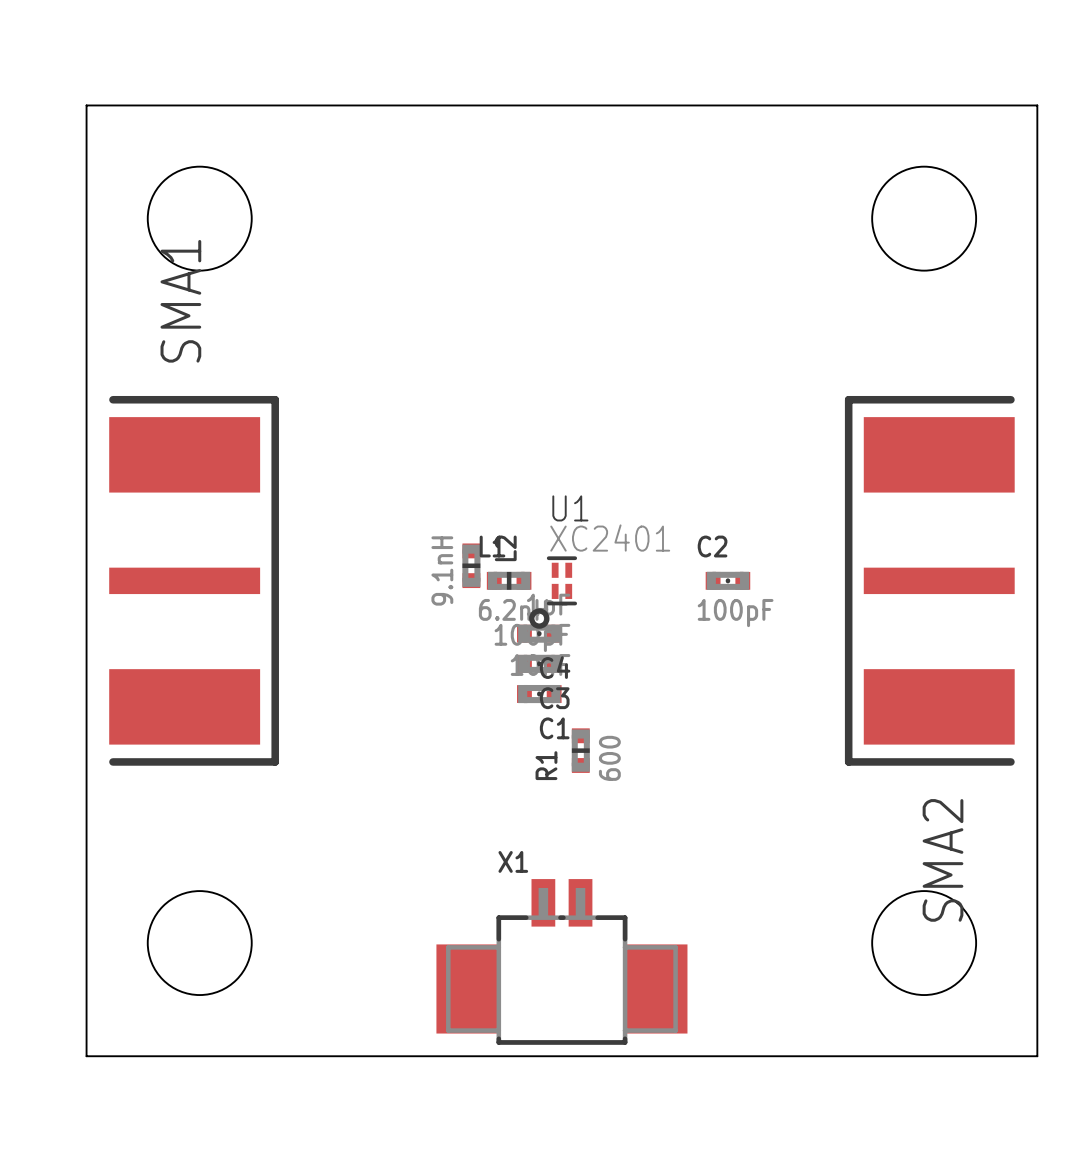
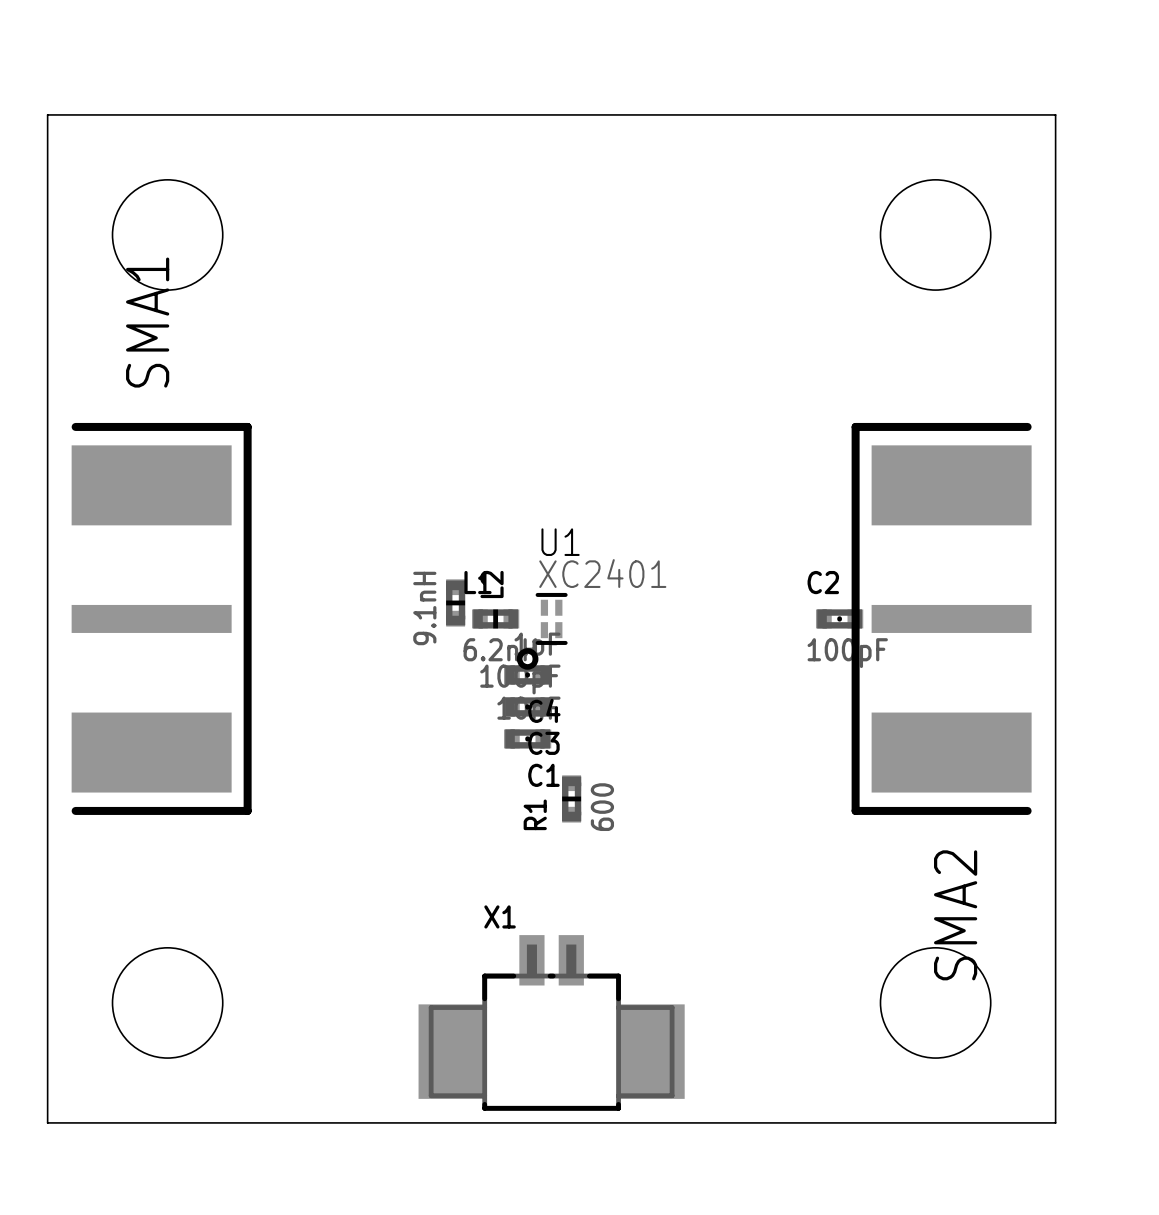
C2 position: (727, 580) -> (839, 618)

